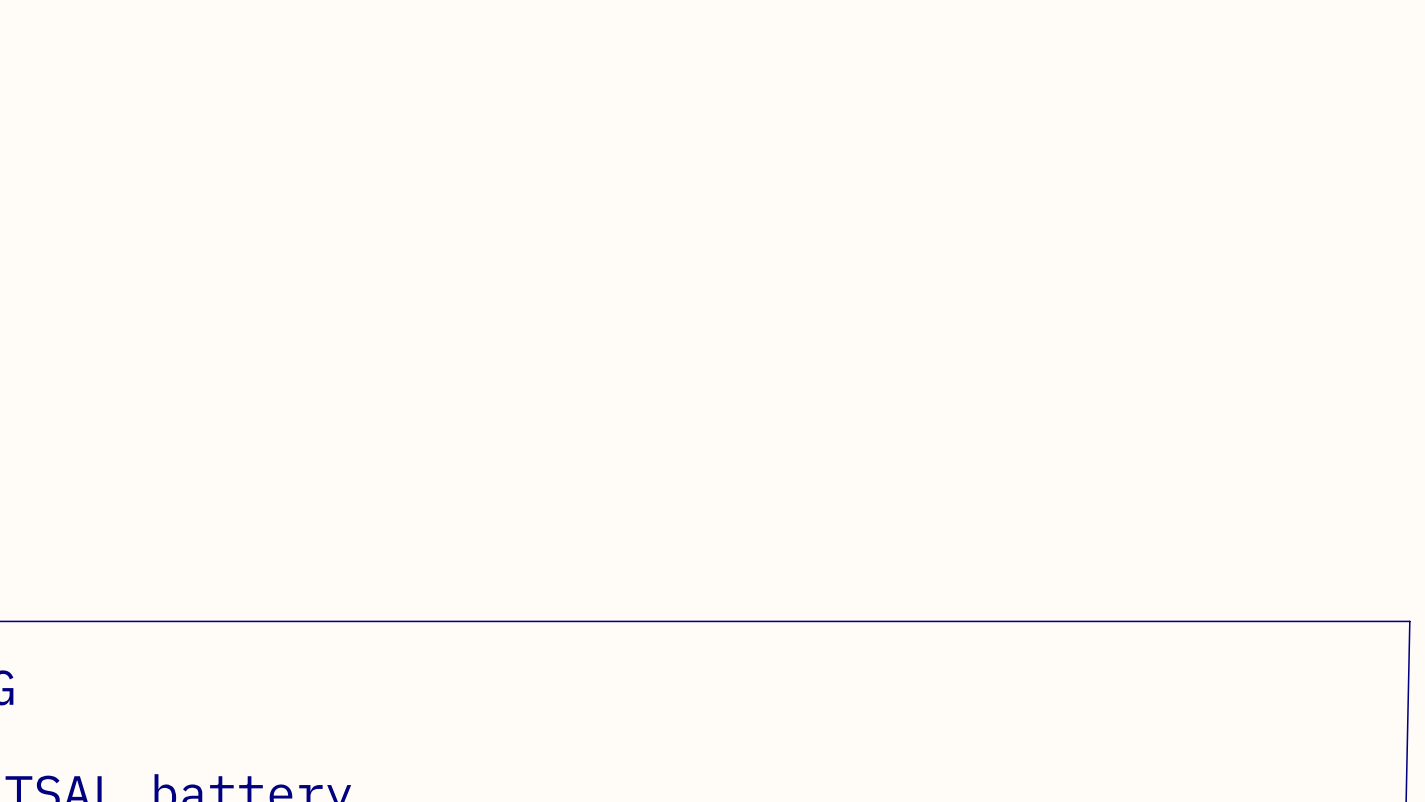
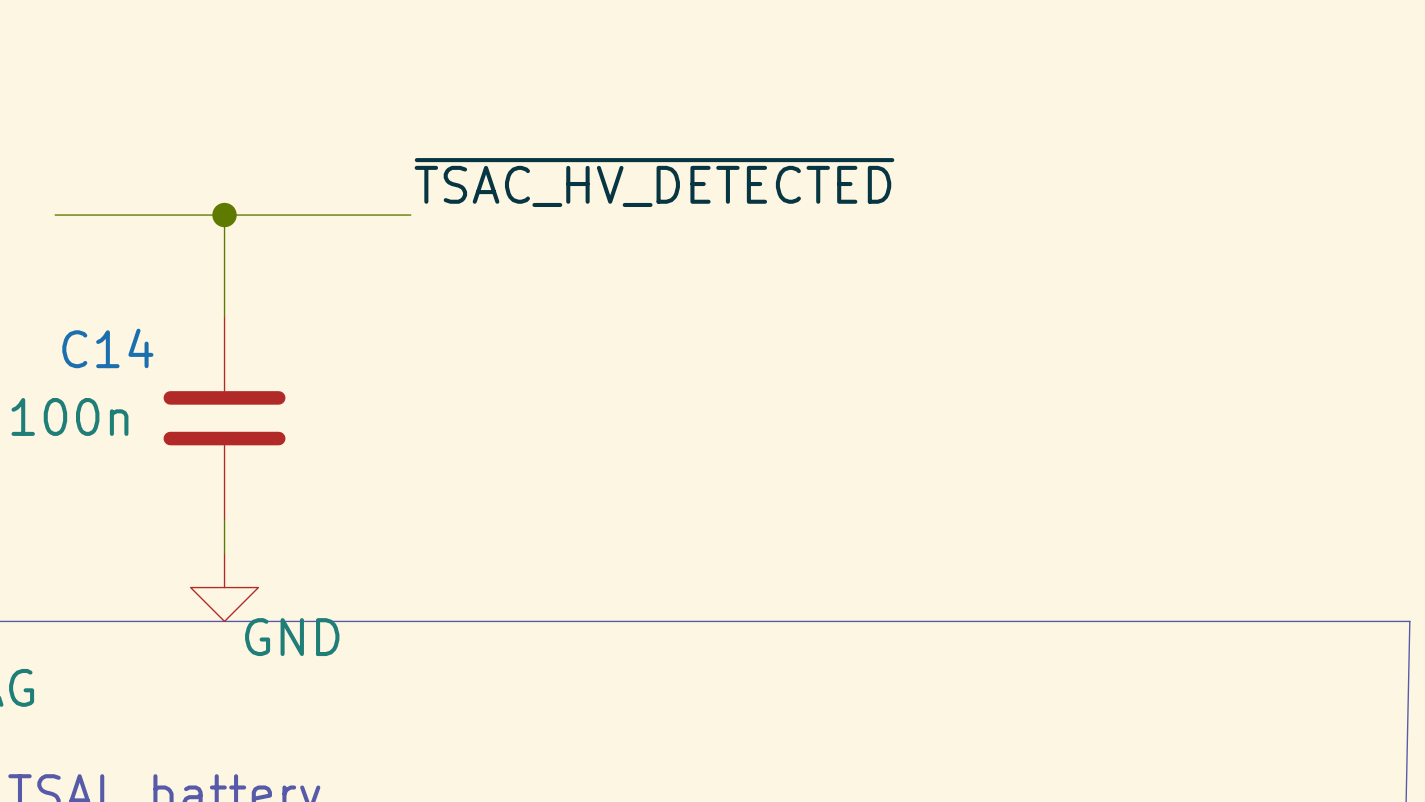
label: none -> ~{TSAC_HV_DETECTED} (654, 182)
wire: none -> (55, 215) (410, 215)
wire: none -> (224, 215) (224, 316)
junction: none -> (224, 215)
C14: none -> 100n (224, 418)
wire: none -> (224, 519) (224, 553)
power symbol: none -> GND (224, 587)

